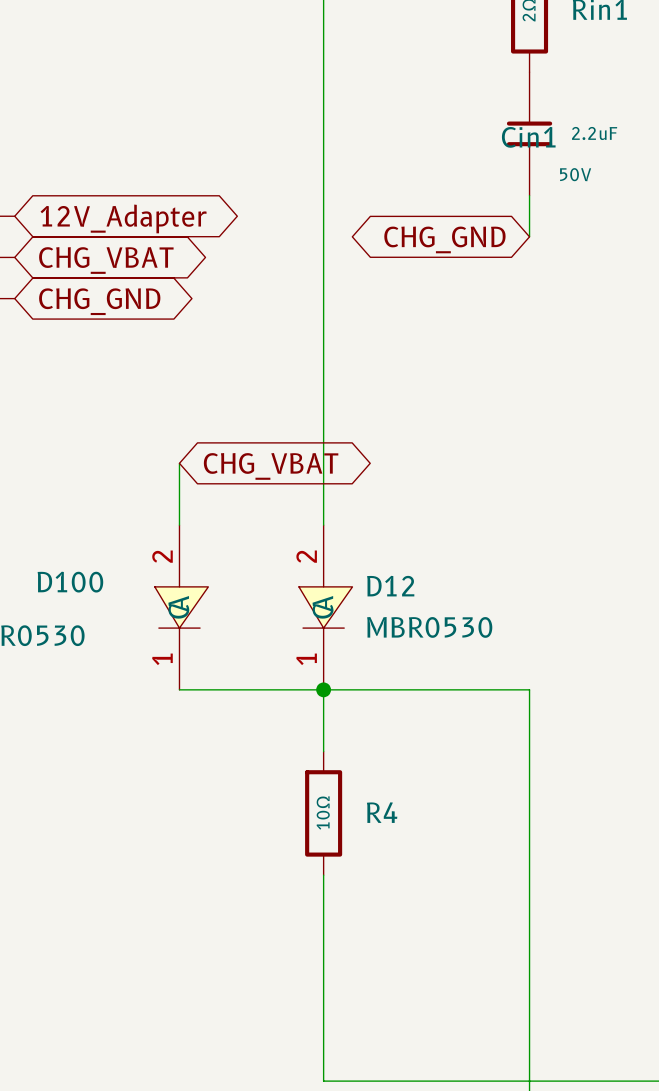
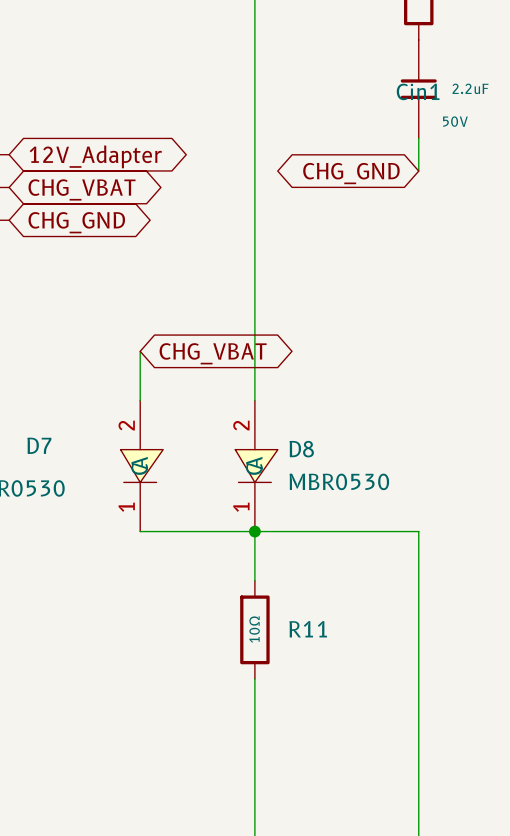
D100 name: D100 (70, 582) -> D7 (39, 445)
D12 name: D12 (390, 586) -> D8 (301, 449)
R4 name: R4 (382, 812) -> R11 (308, 629)

